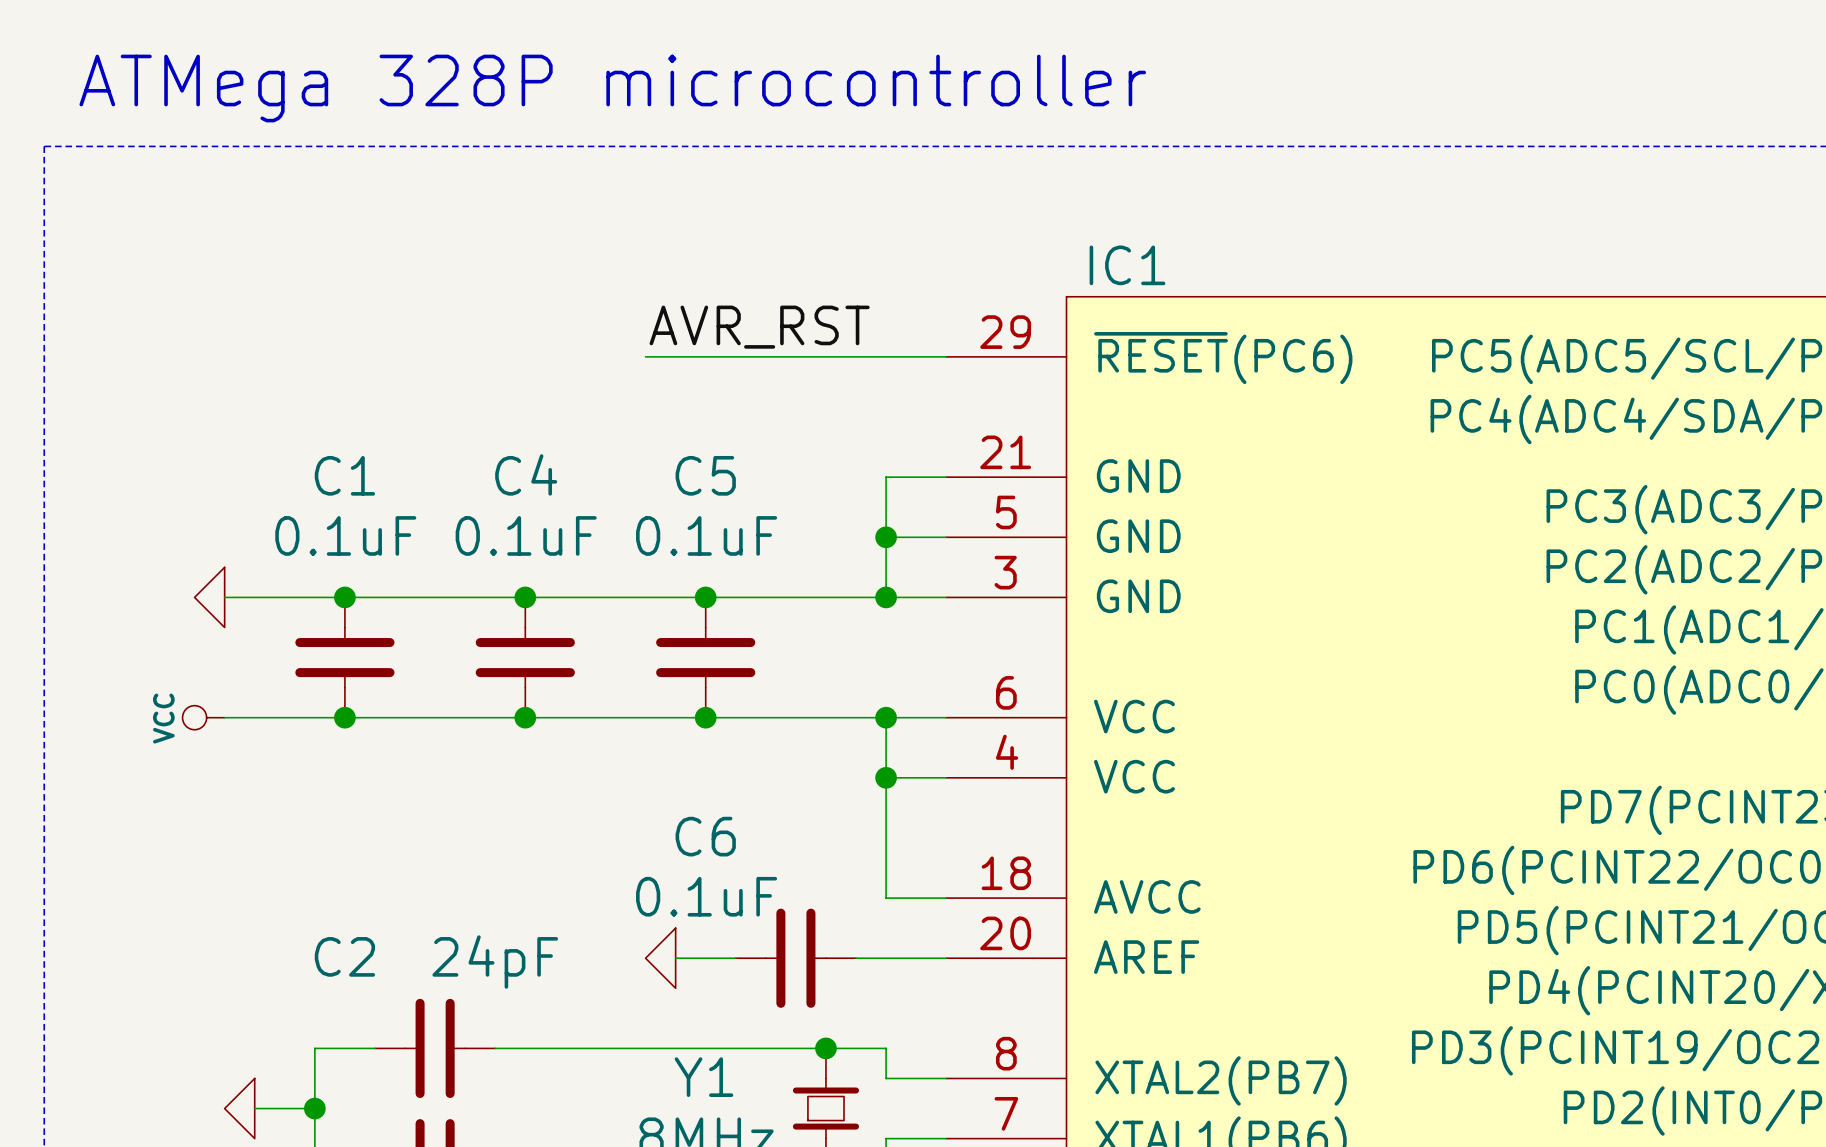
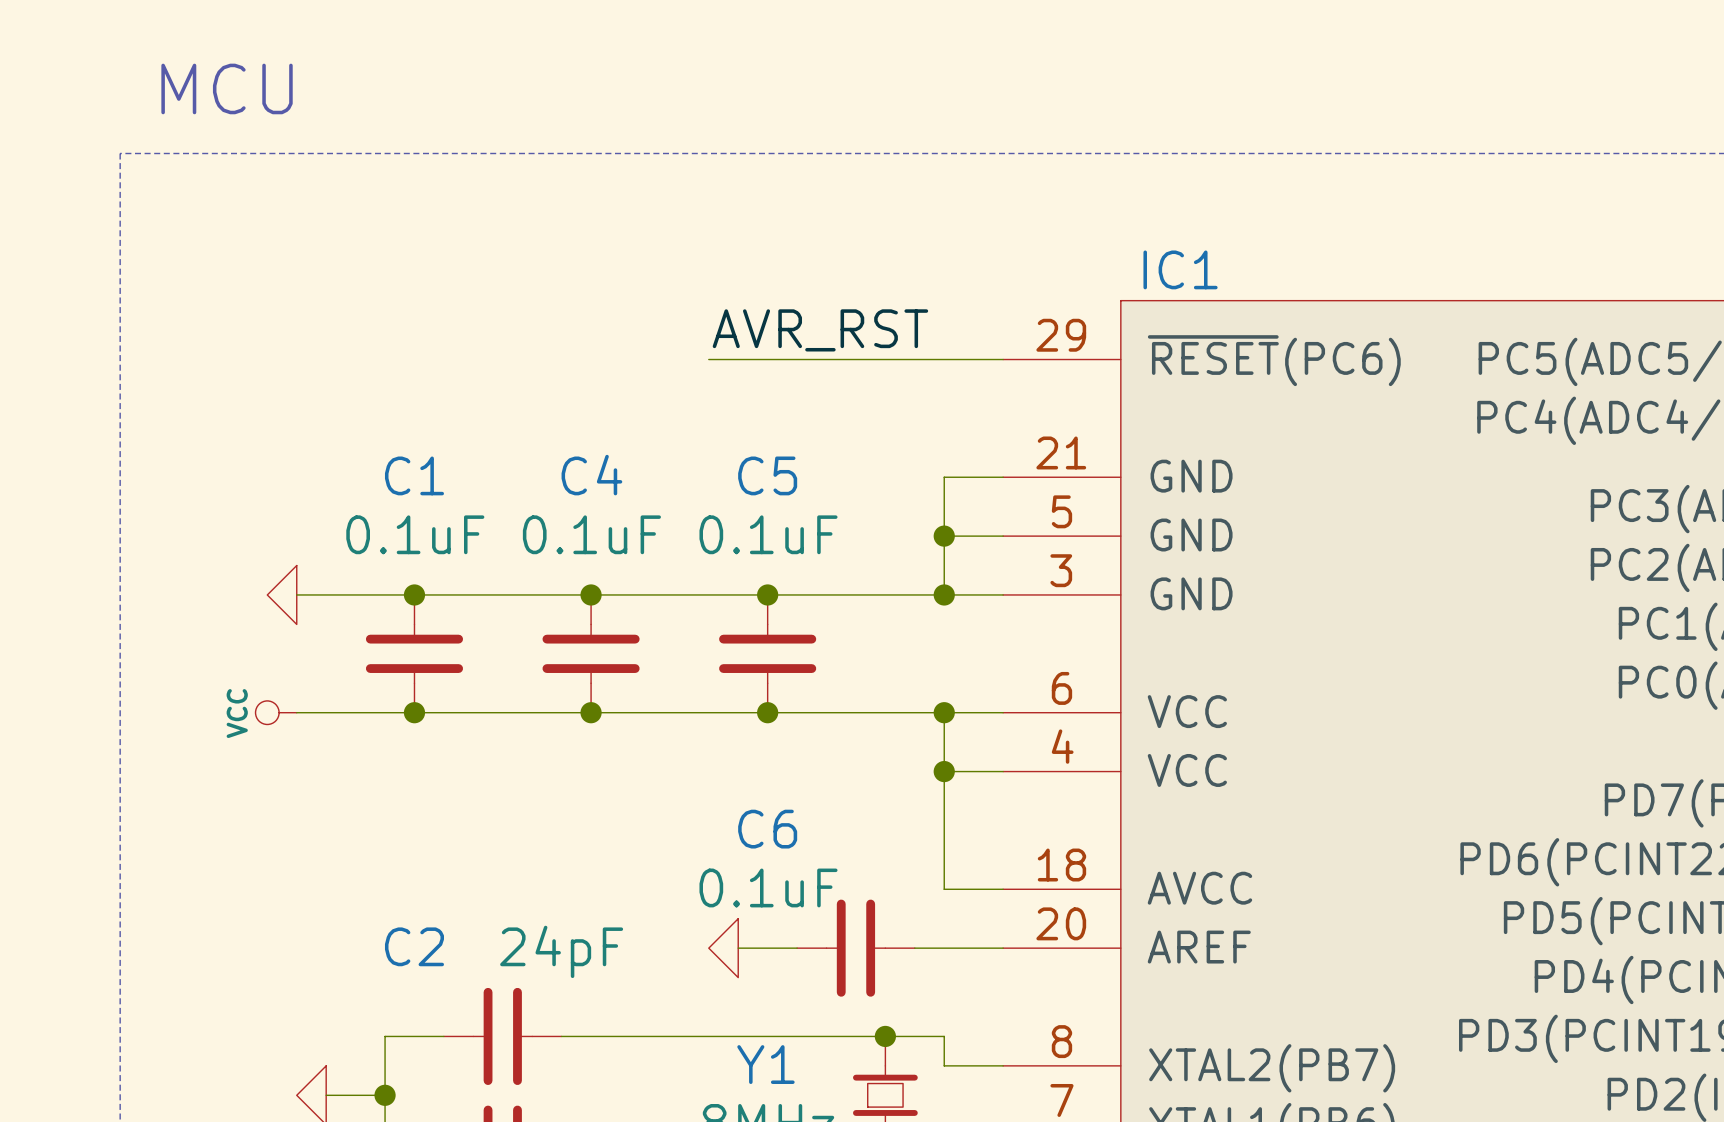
text: ATMega 328P microcontroller (612, 88) -> MCU (227, 88)

